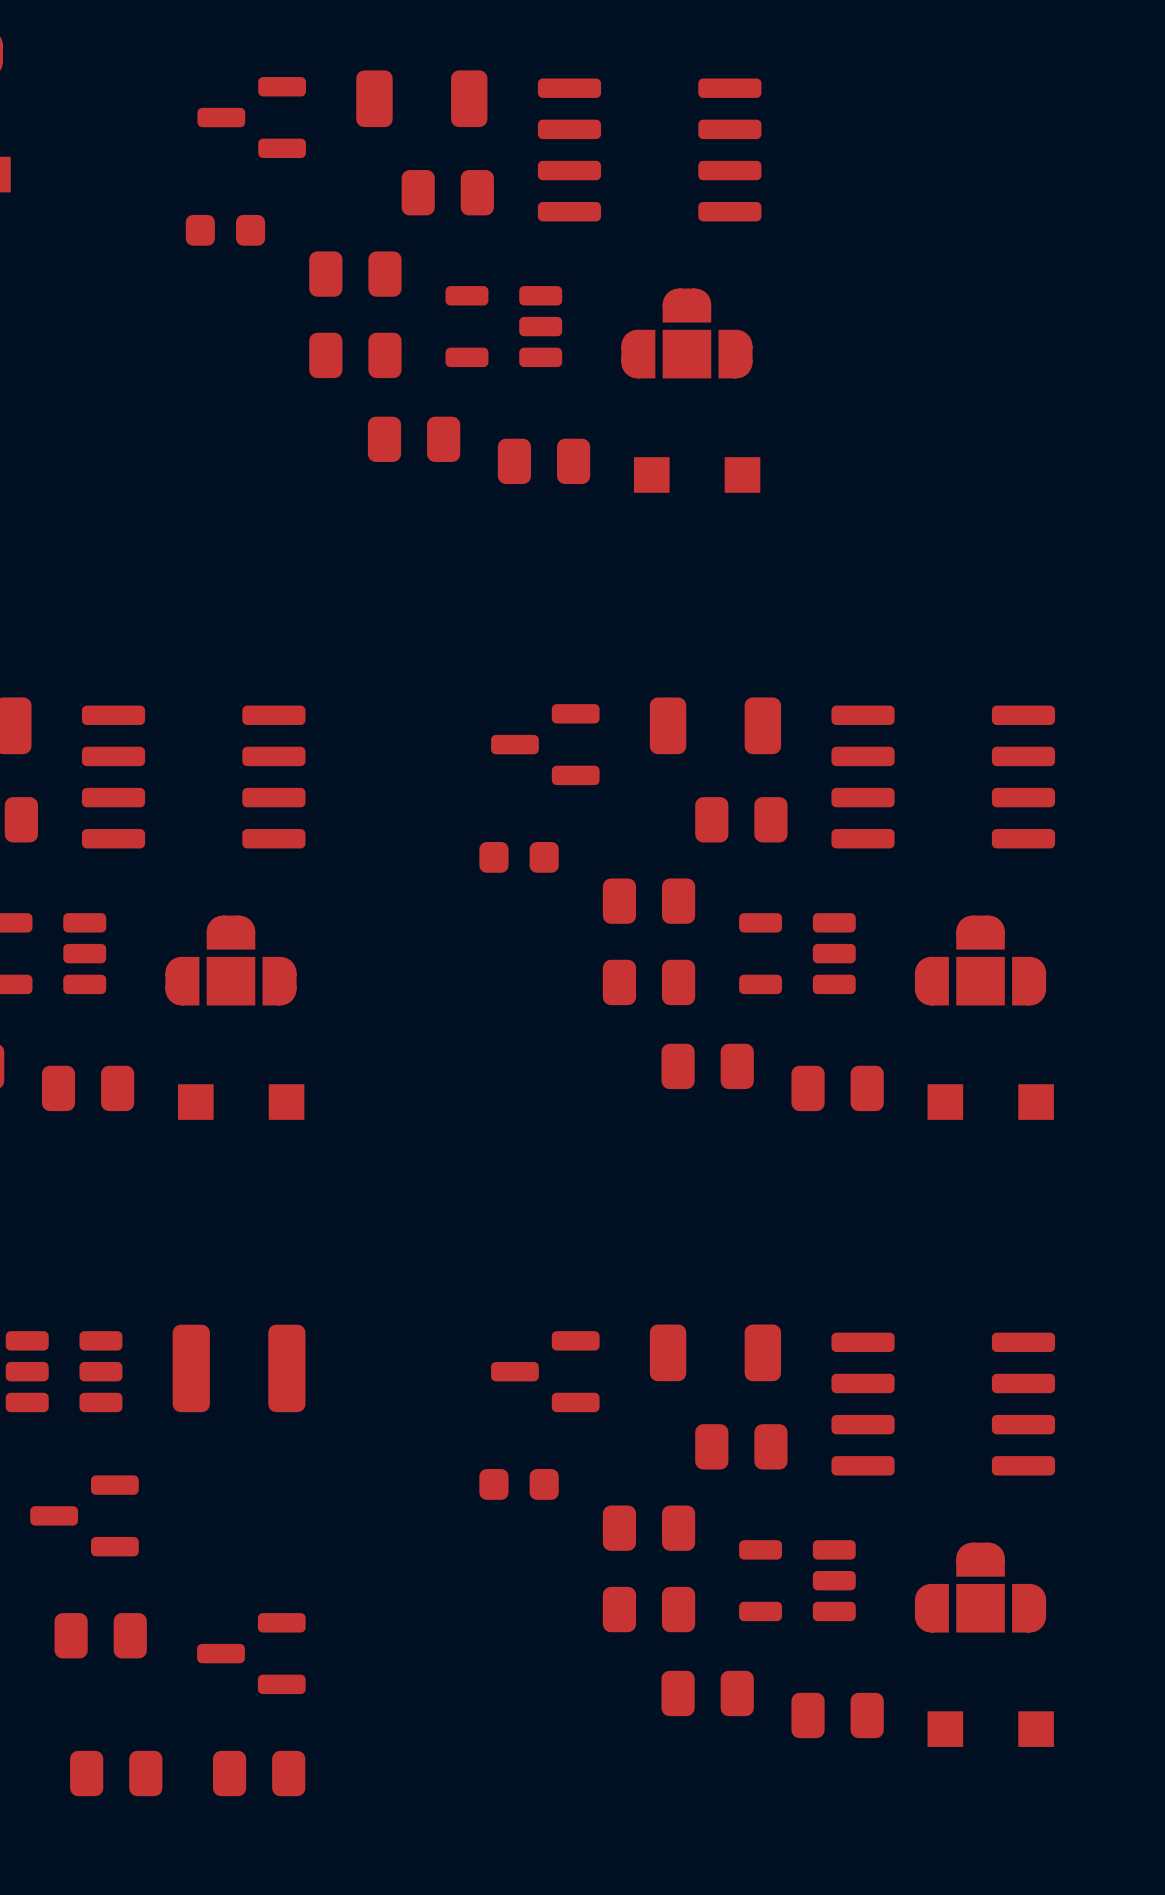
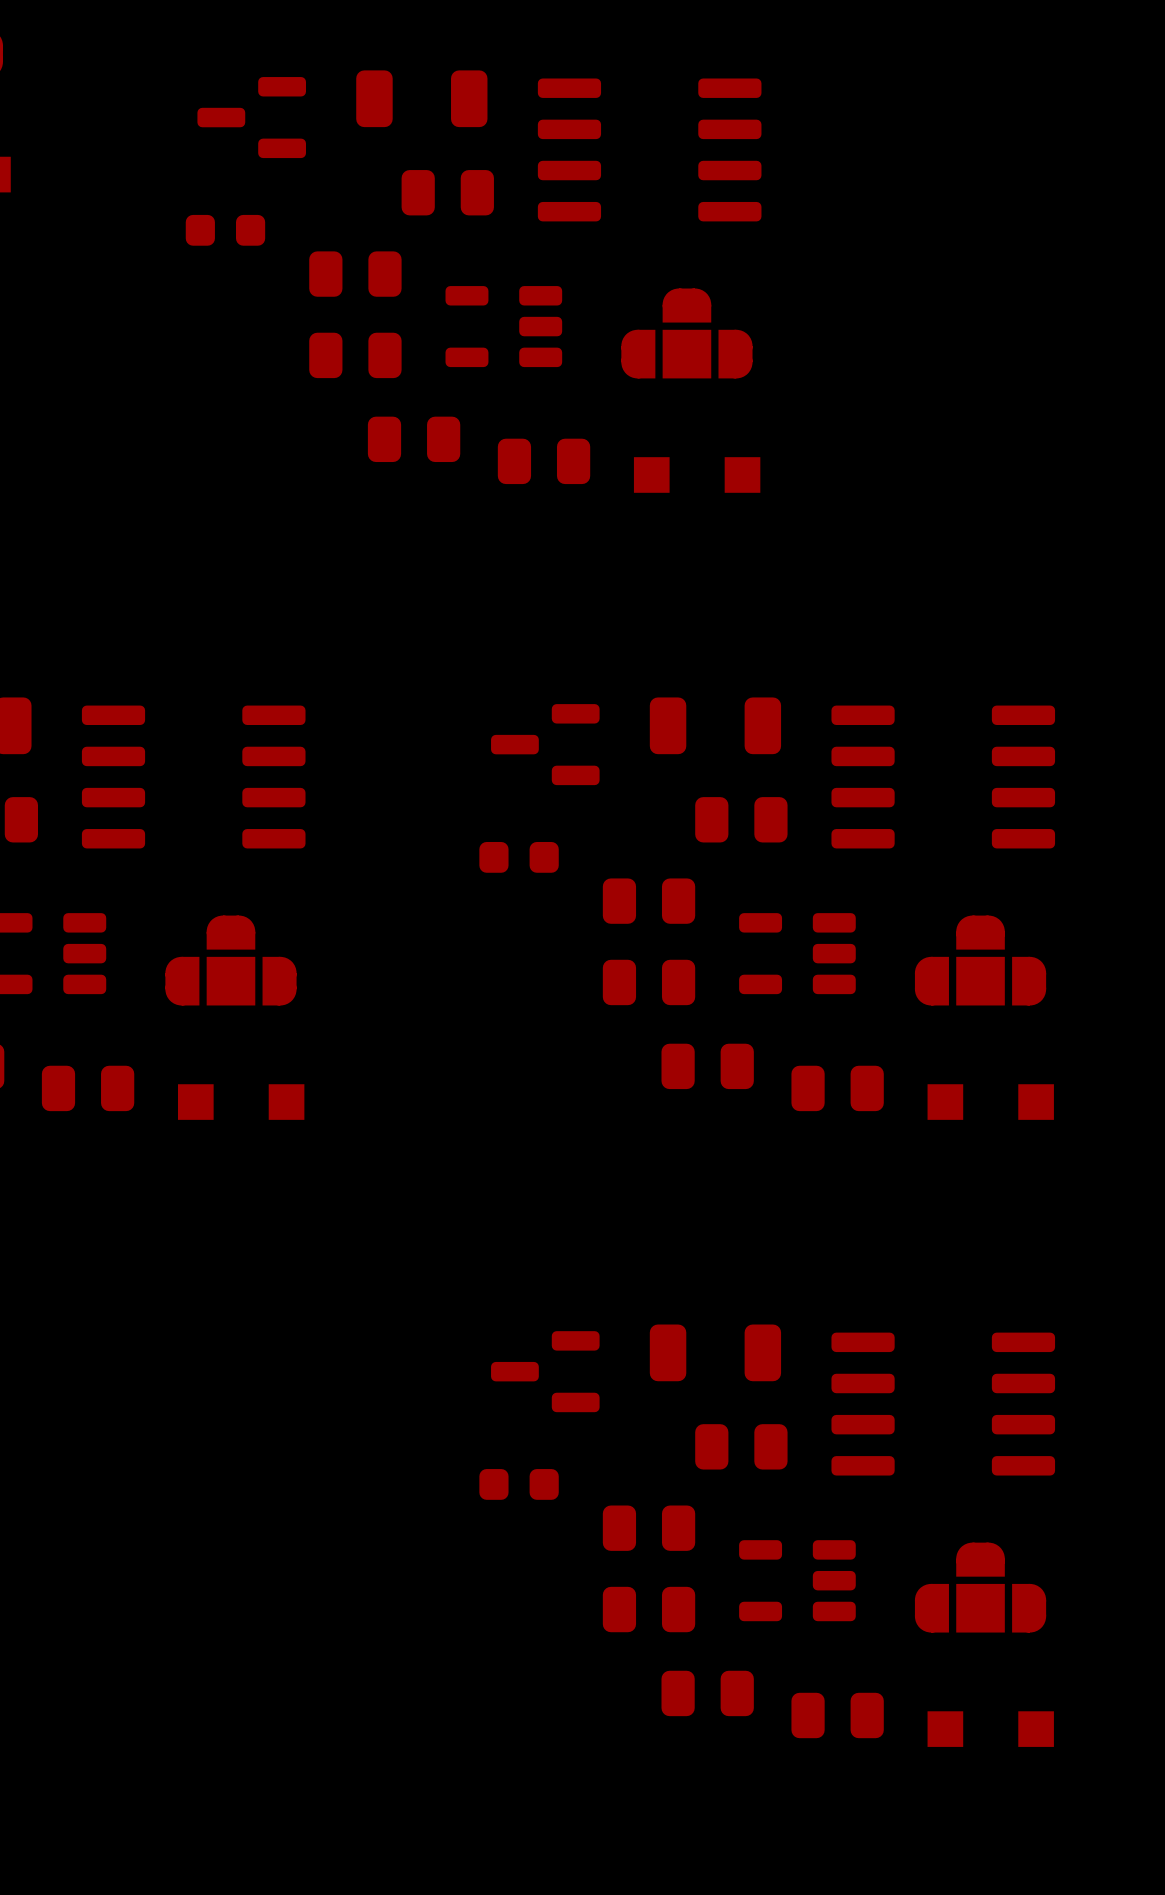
part: (239, 1368) -> none
part: (64, 1371) -> none
part: (84, 1515) -> none
part: (100, 1635) -> none
part: (251, 1653) -> none
part: (116, 1773) -> none
part: (259, 1773) -> none

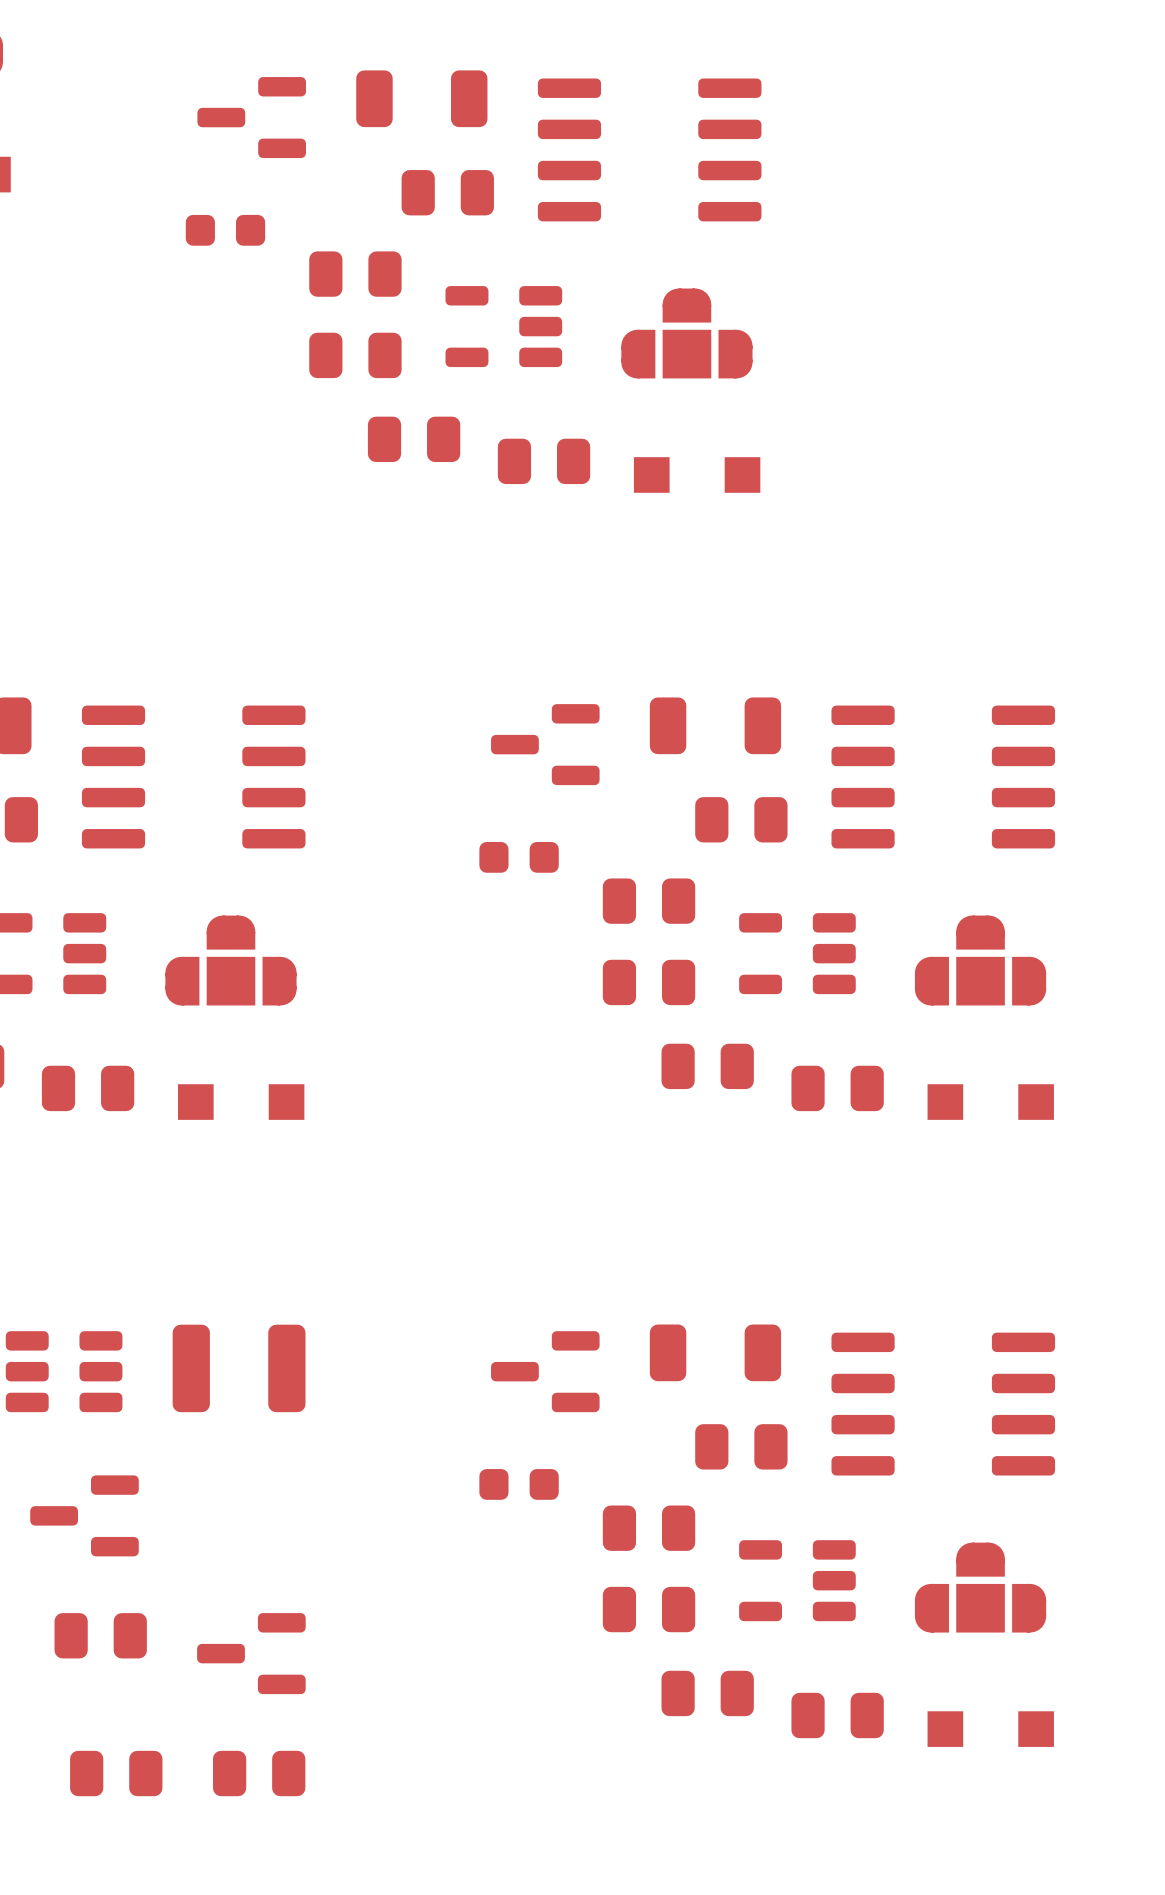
part: none -> (239, 1368)
part: none -> (64, 1371)
part: none -> (84, 1515)
part: none -> (100, 1635)
part: none -> (251, 1653)
part: none -> (116, 1773)
part: none -> (259, 1773)

